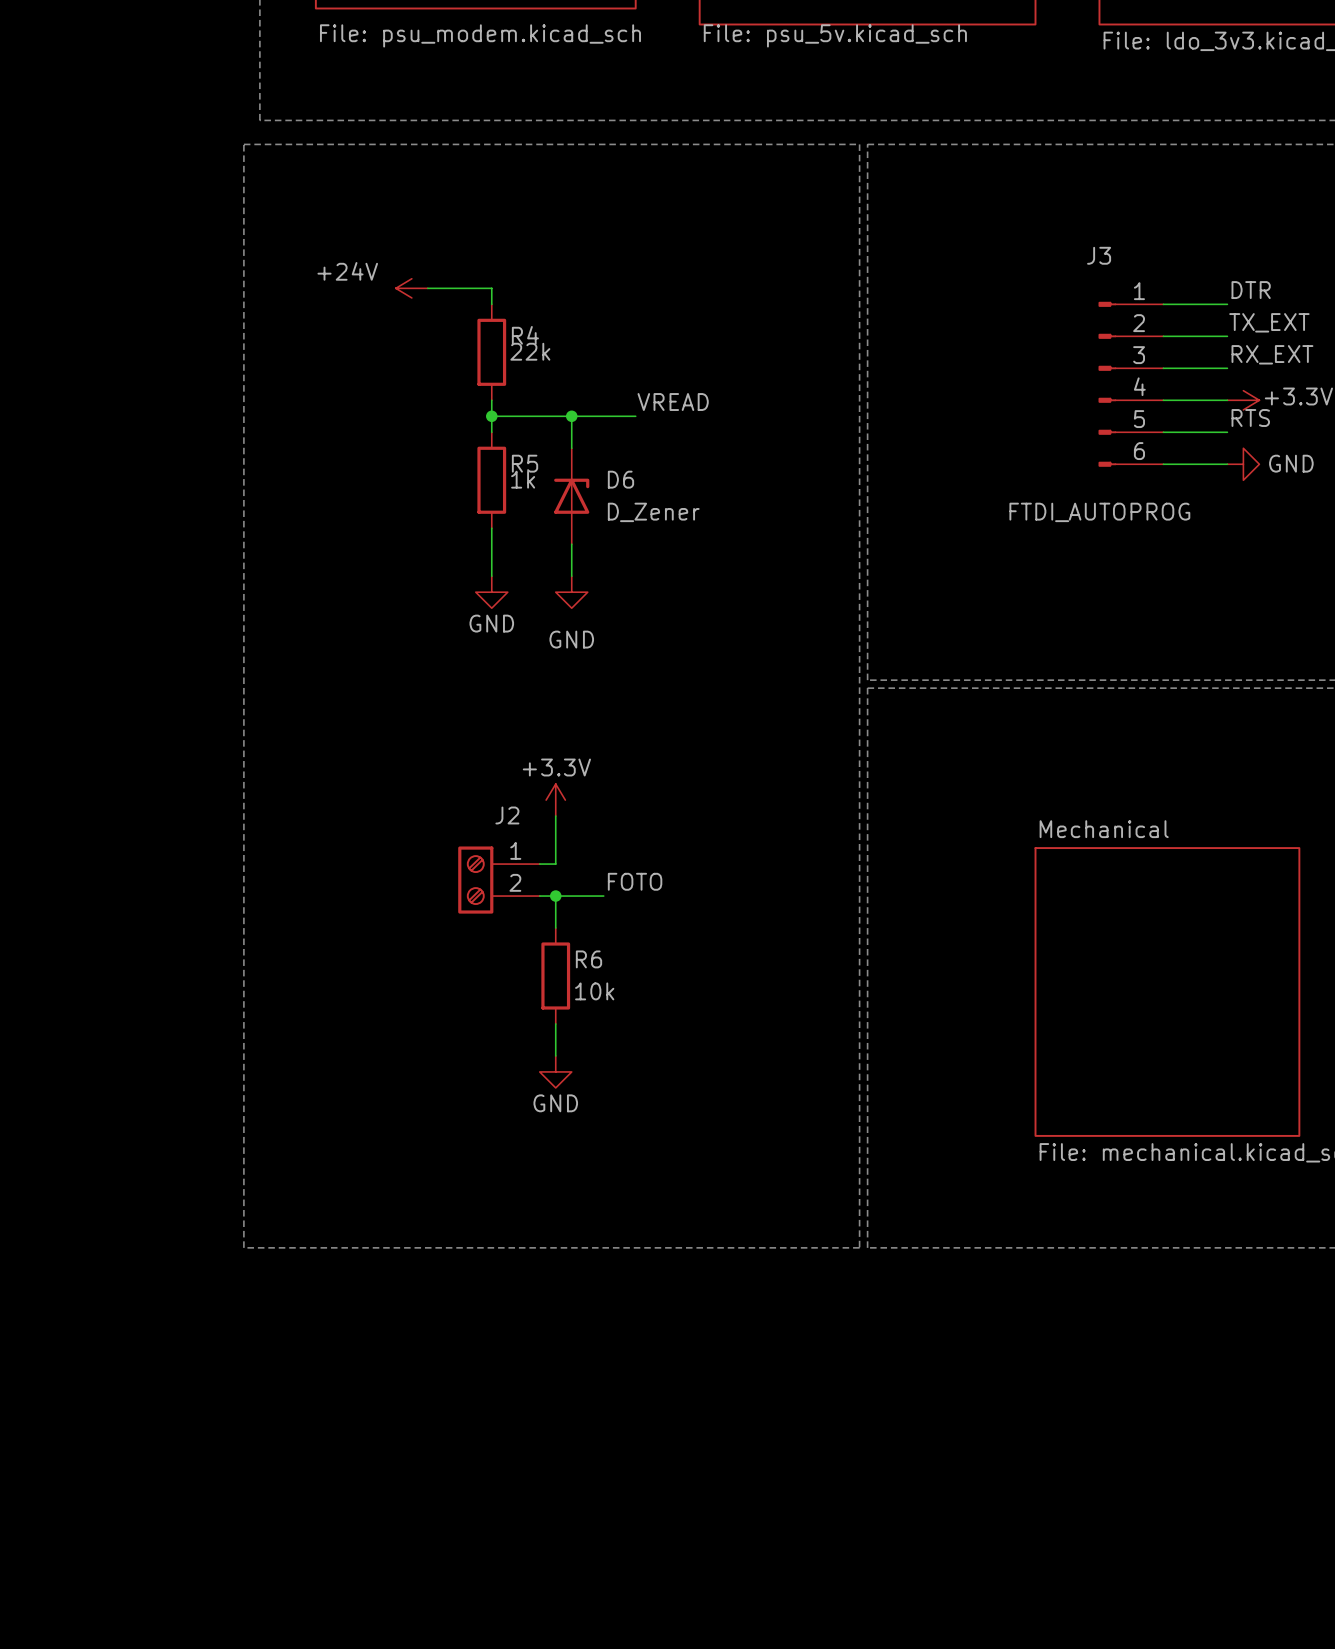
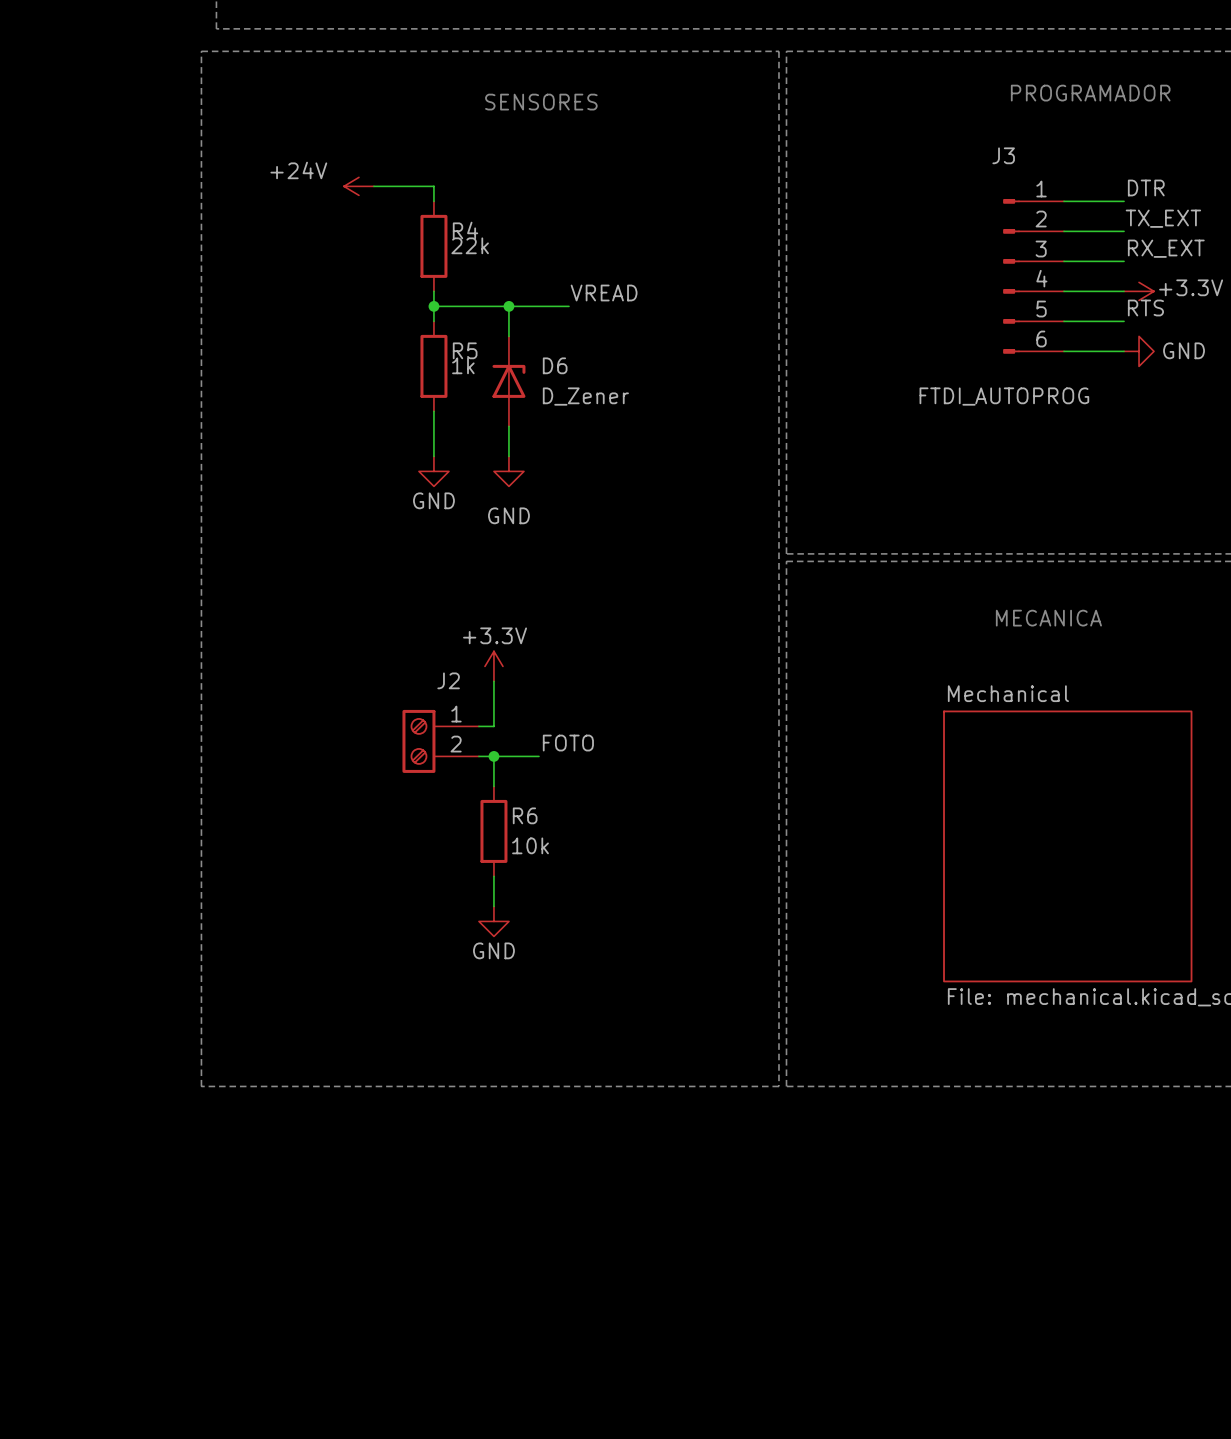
text: none -> PROGRAMADOR (1090, 93)
text: none -> SENSORES (541, 102)
text: none -> MECANICA (1048, 618)

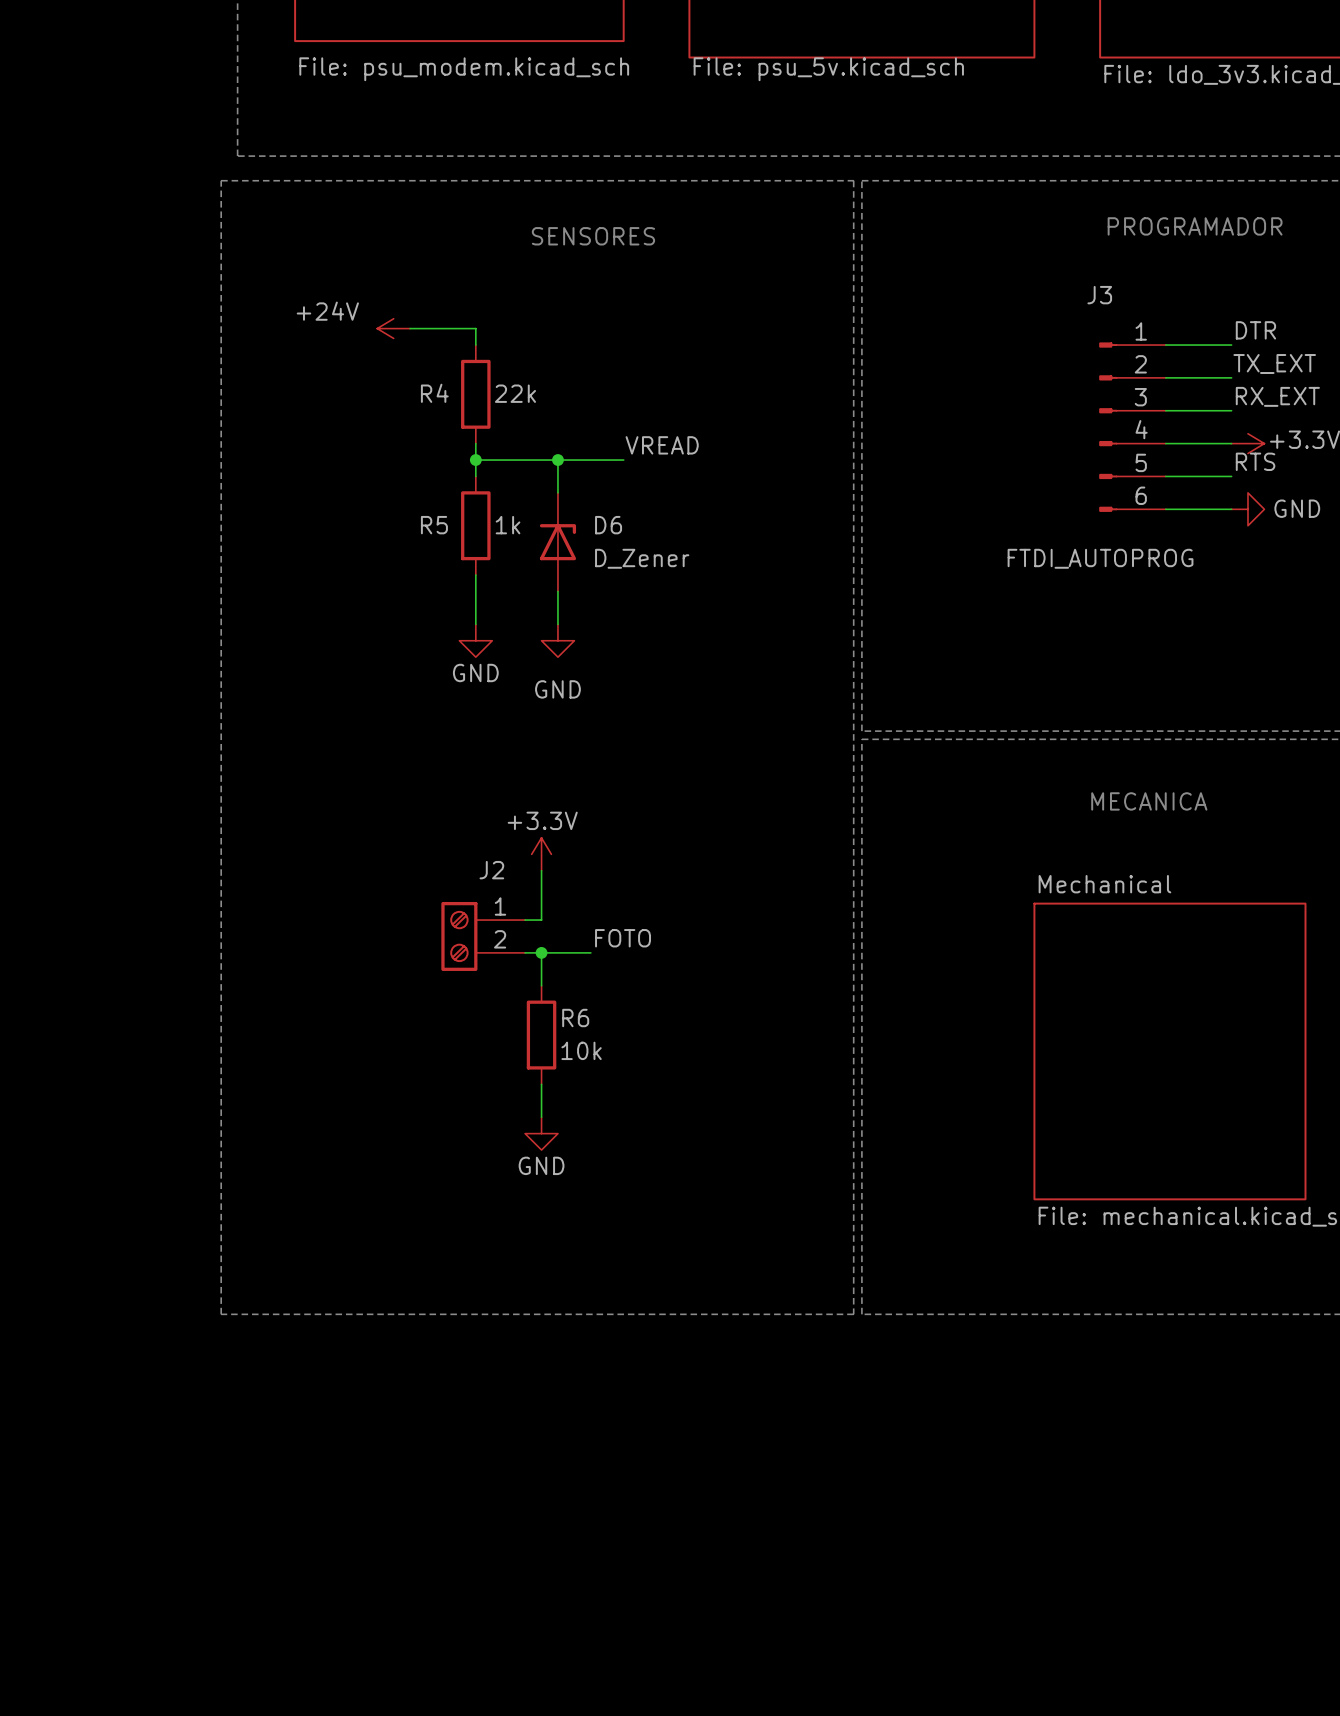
R4 name position: R4 (465, 230) -> R4 (434, 393)
R5 name position: R5 (465, 350) -> R5 (434, 525)

